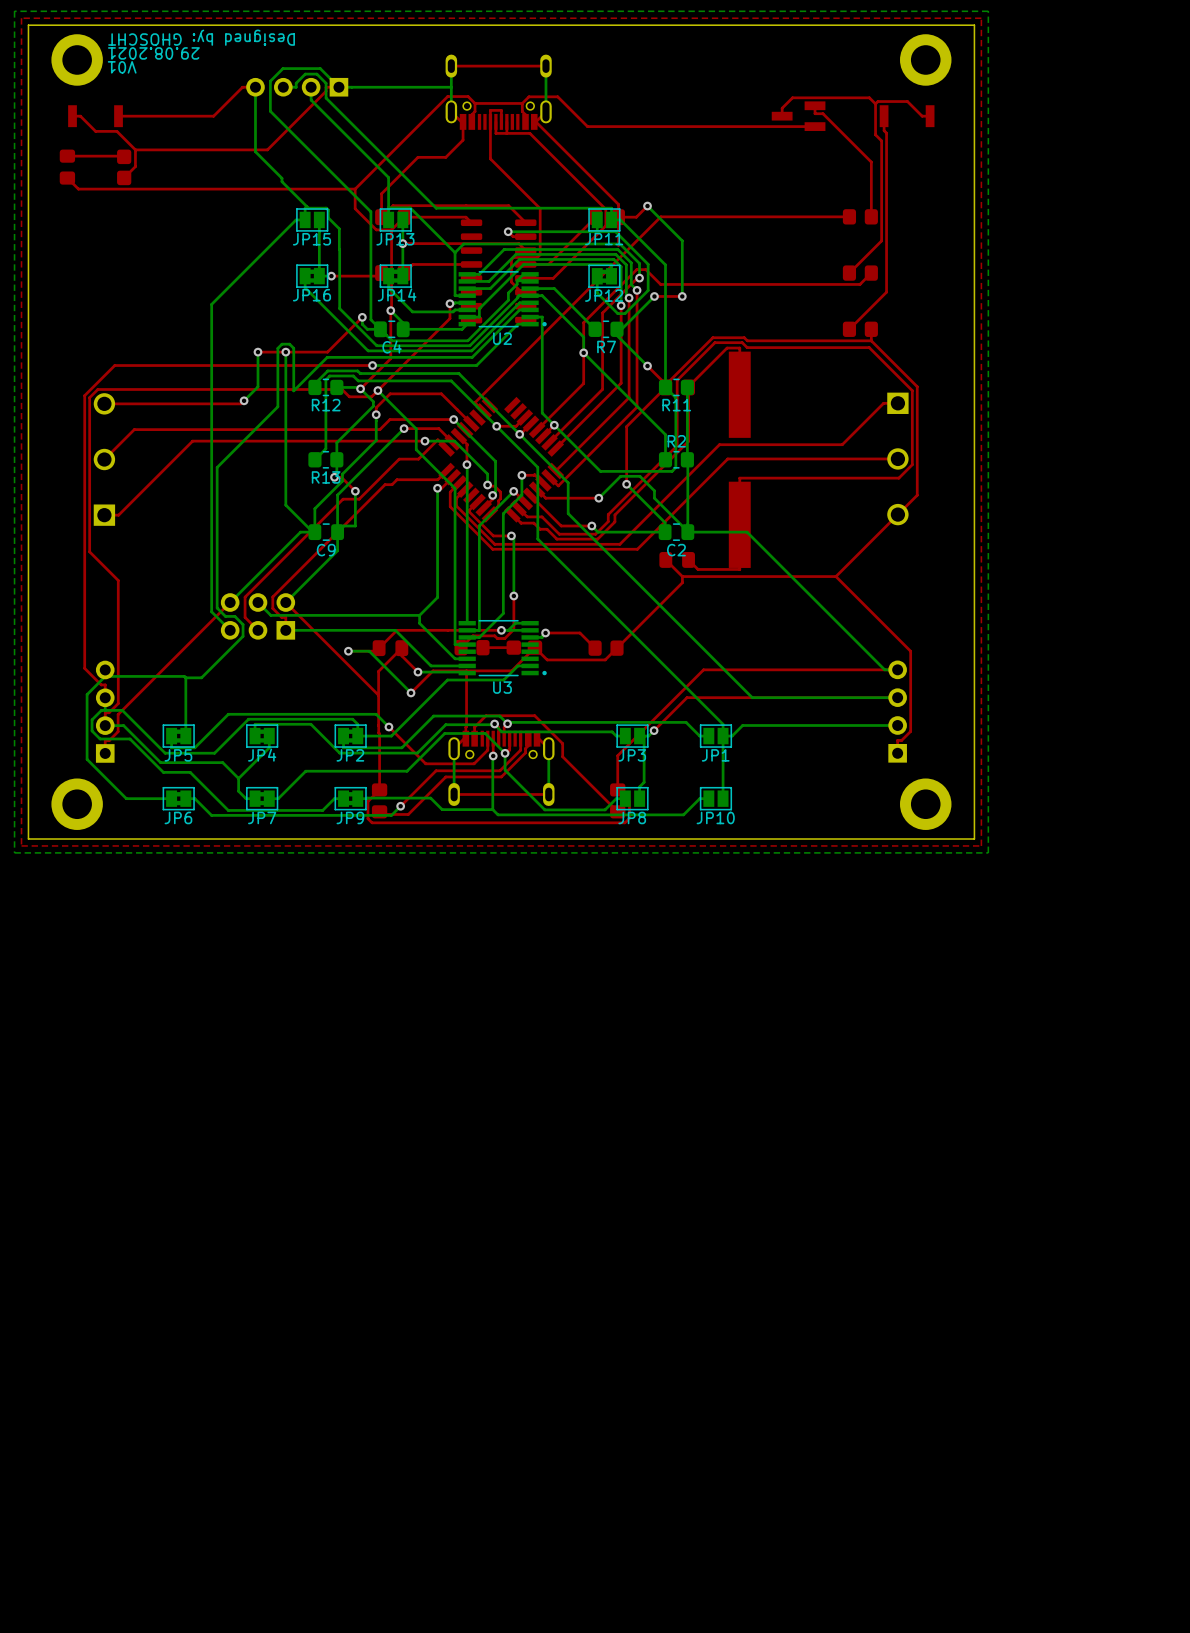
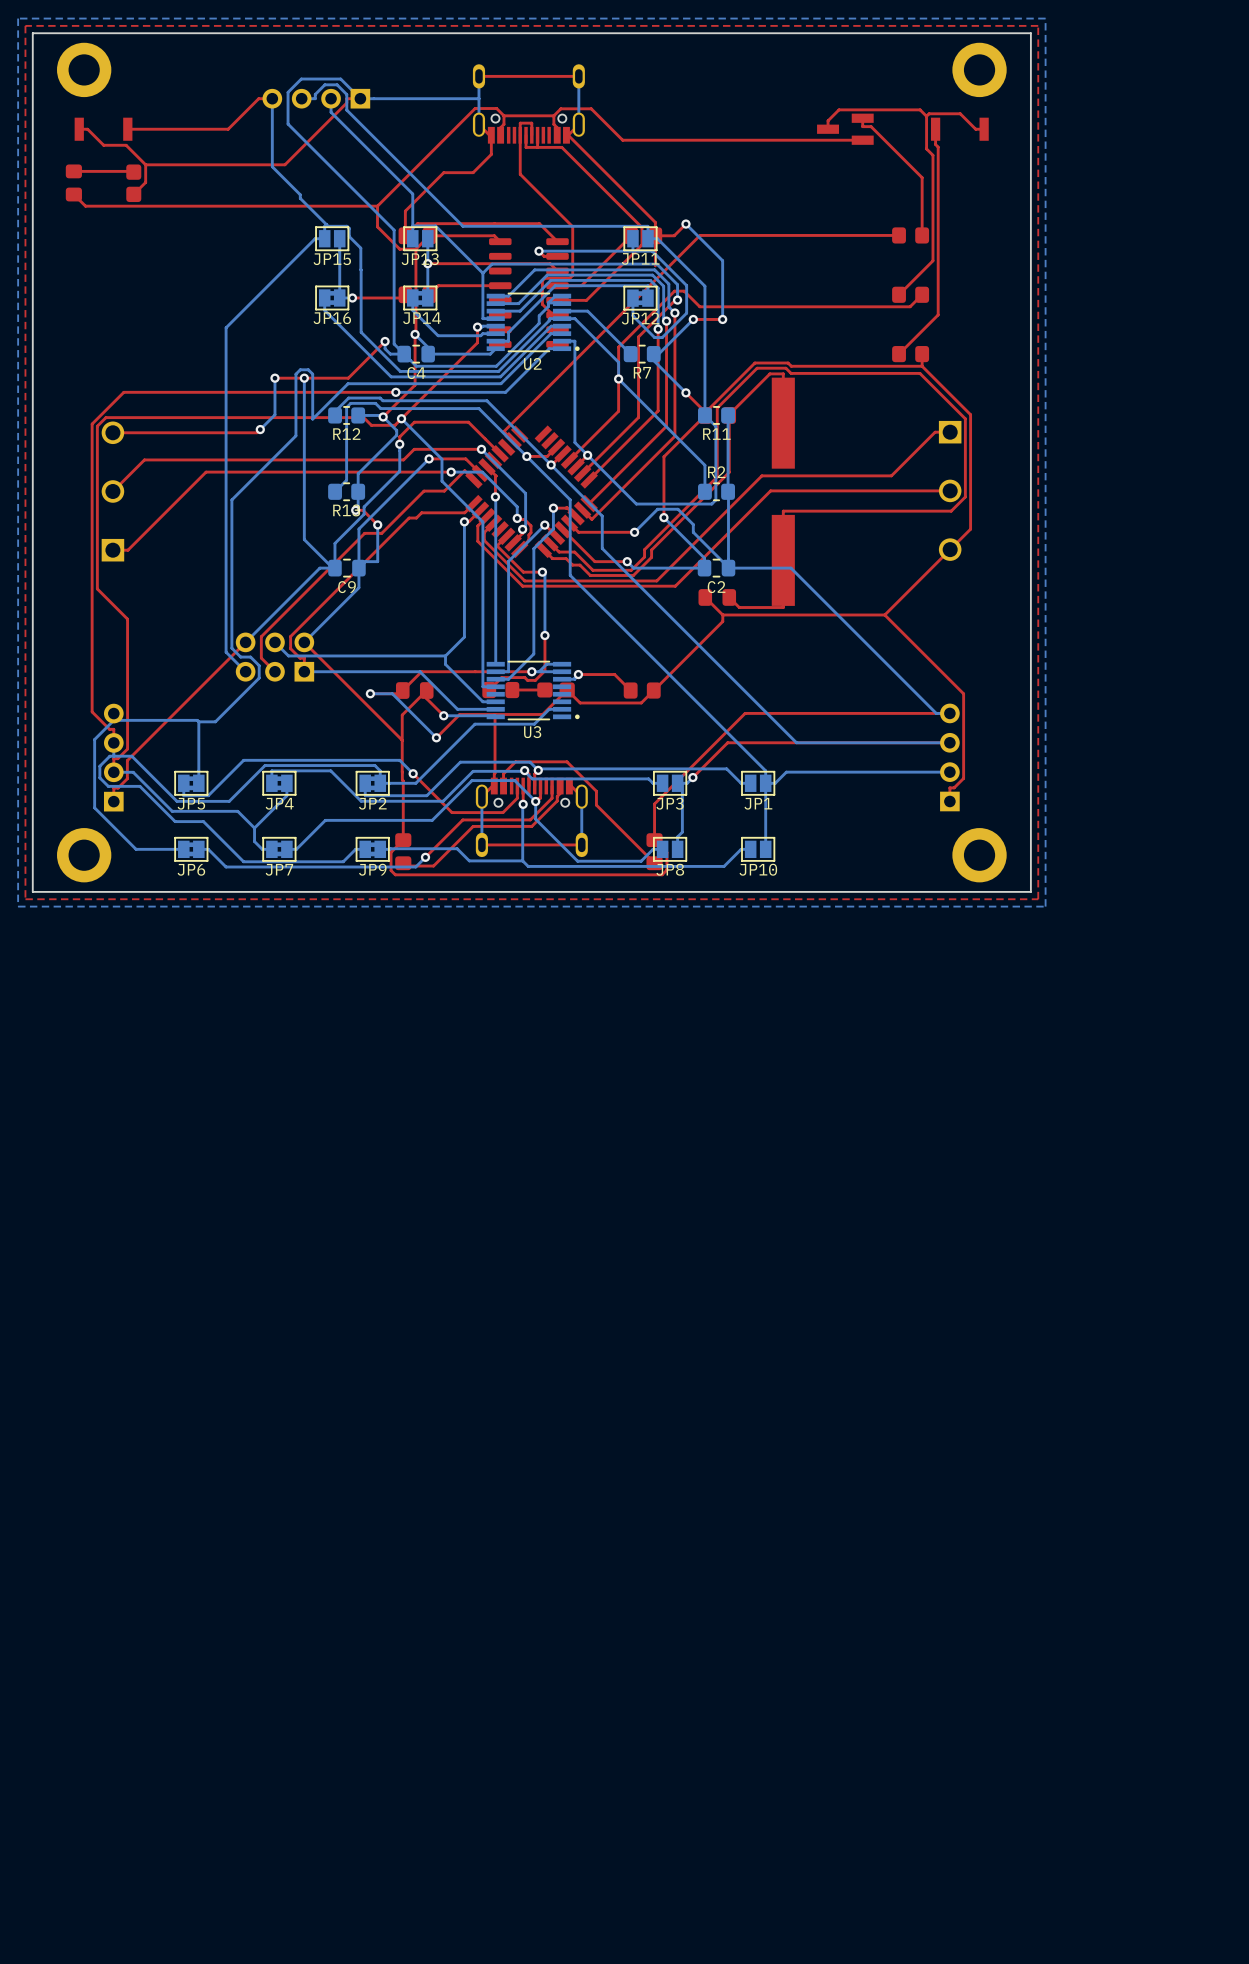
text: Designed by: GHOSCHT (201, 37) -> none
text: 29.08.2021 (153, 53) -> none
text: V01 (122, 67) -> none

